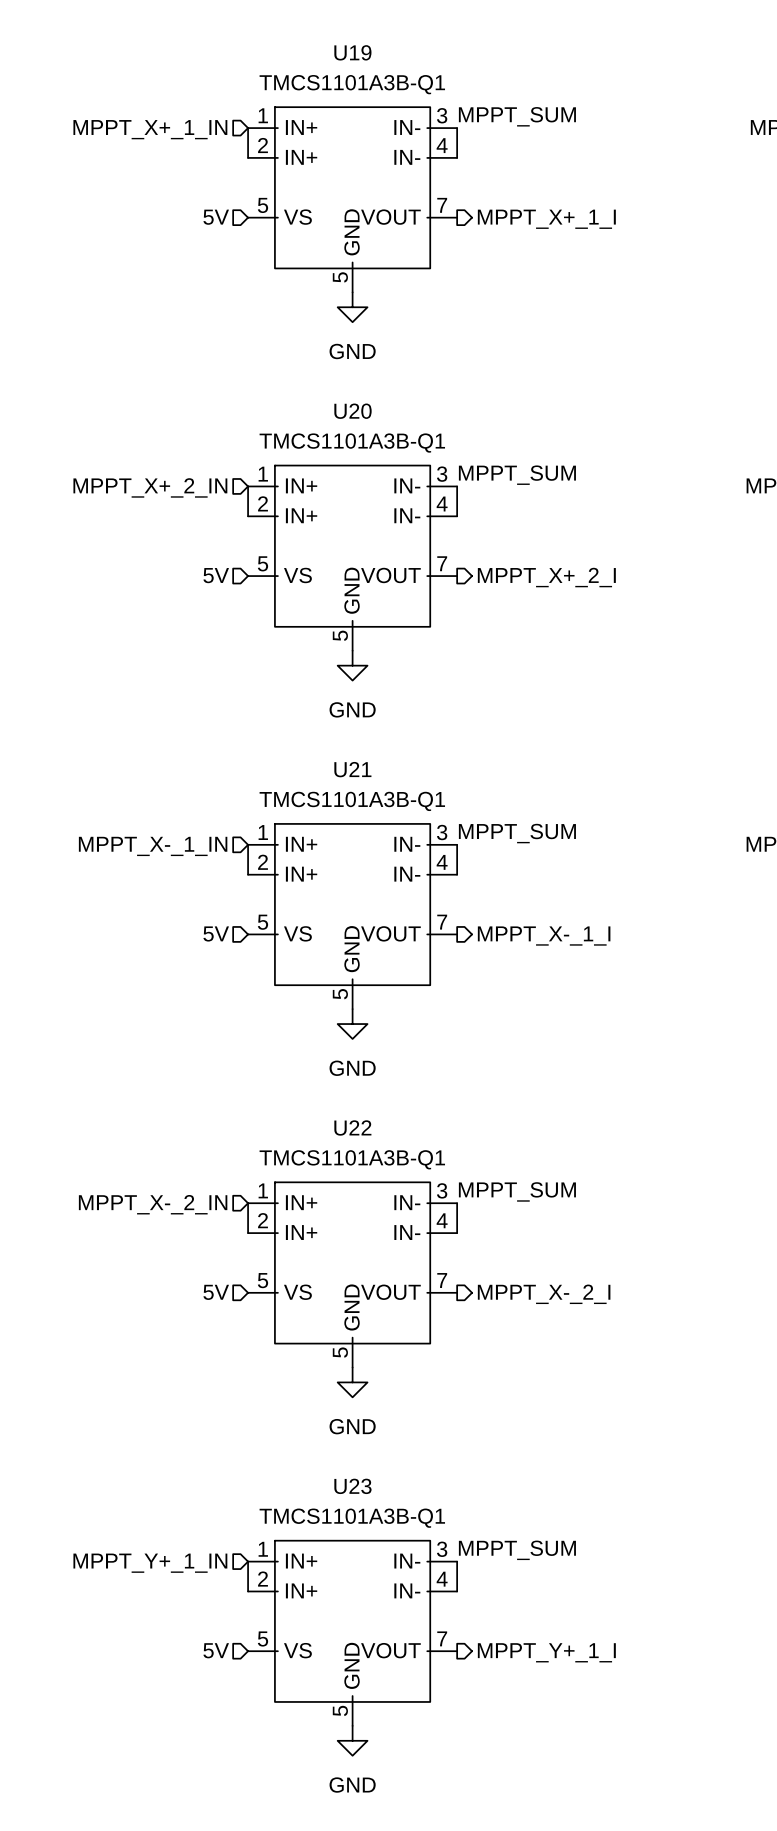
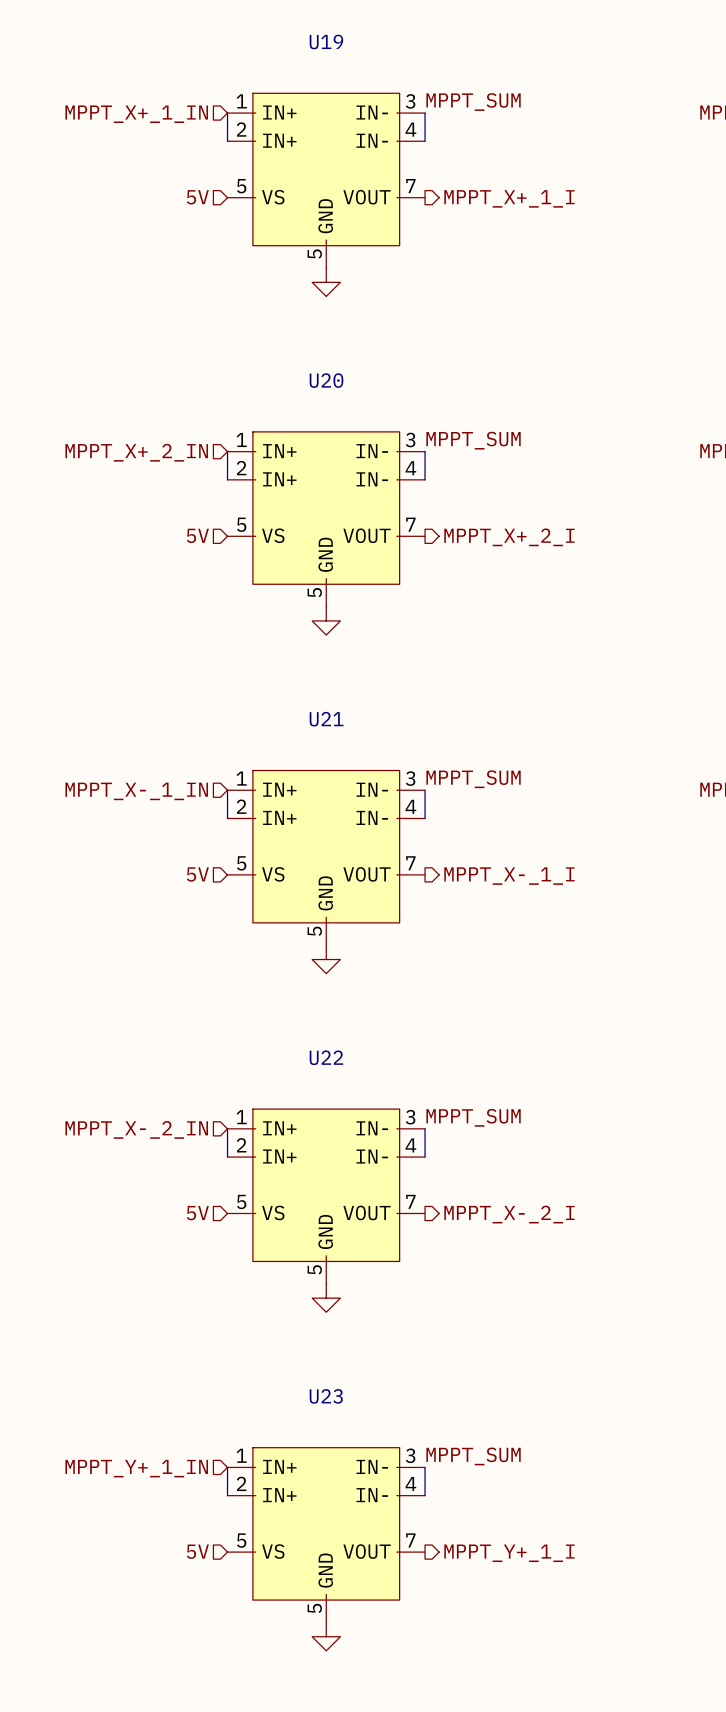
U19 value: TMCS1101A3B-Q1 (352, 84) -> none
power symbol text: GND (352, 351) -> none
U20 value: TMCS1101A3B-Q1 (352, 443) -> none
power symbol text: GND (352, 709) -> none
U21 value: TMCS1101A3B-Q1 (352, 801) -> none
power symbol text: GND (352, 1068) -> none
U22 value: TMCS1101A3B-Q1 (352, 1159) -> none
power symbol text: GND (352, 1426) -> none
U23 value: TMCS1101A3B-Q1 (352, 1518) -> none
power symbol text: GND (352, 1785) -> none

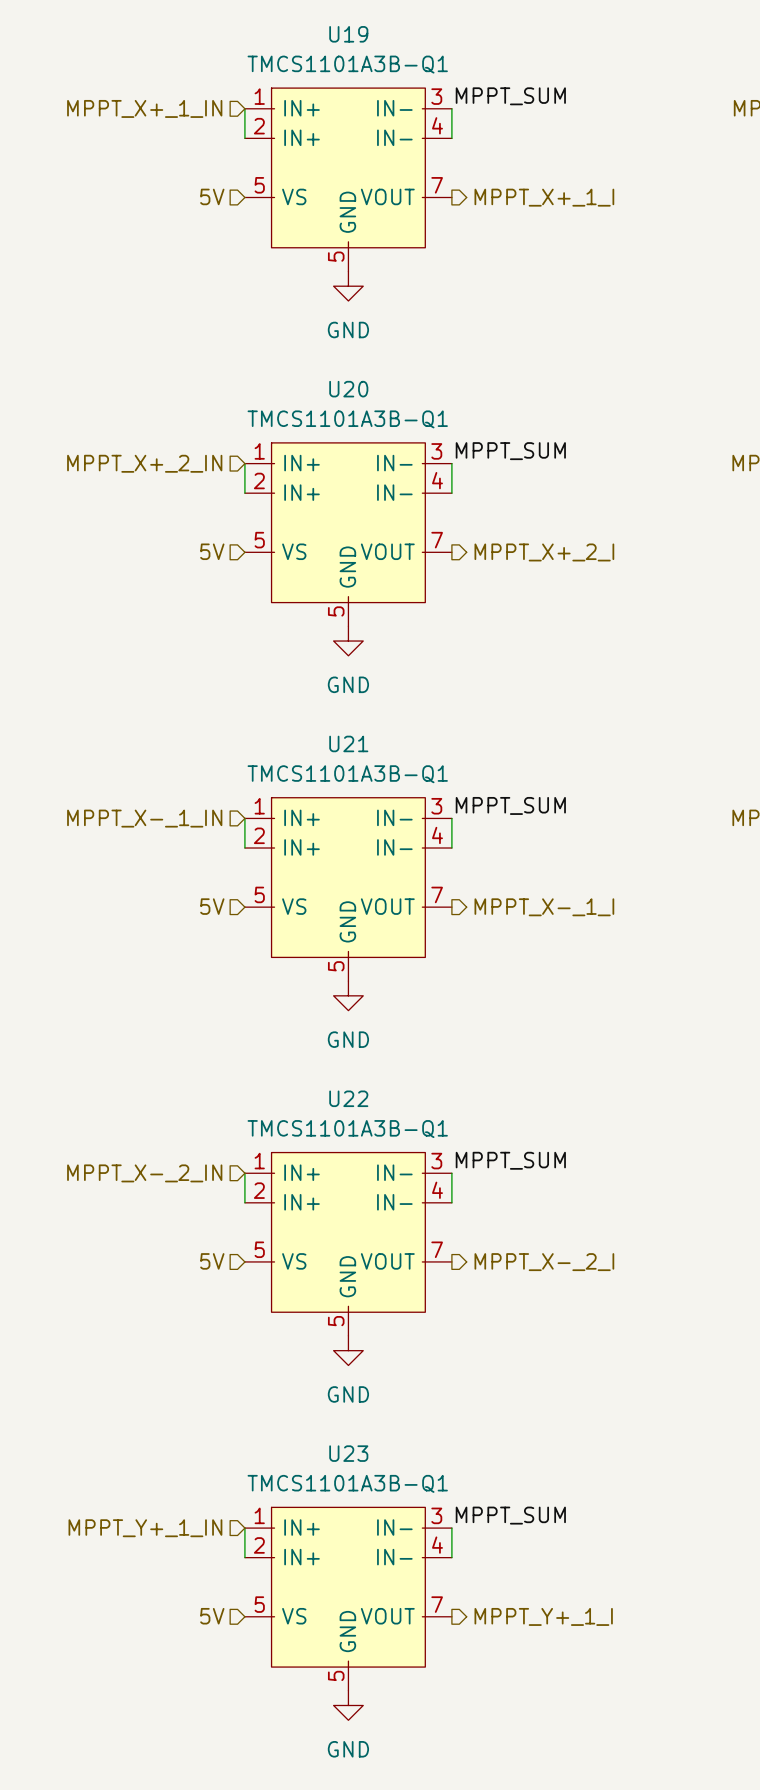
U19 value: none -> TMCS1101A3B-Q1 (347, 64)
power symbol text: none -> GND (348, 330)
U20 value: none -> TMCS1101A3B-Q1 (347, 419)
power symbol text: none -> GND (348, 684)
U21 value: none -> TMCS1101A3B-Q1 (347, 774)
power symbol text: none -> GND (348, 1039)
U22 value: none -> TMCS1101A3B-Q1 (347, 1129)
power symbol text: none -> GND (348, 1394)
U23 value: none -> TMCS1101A3B-Q1 (347, 1483)
power symbol text: none -> GND (348, 1749)

